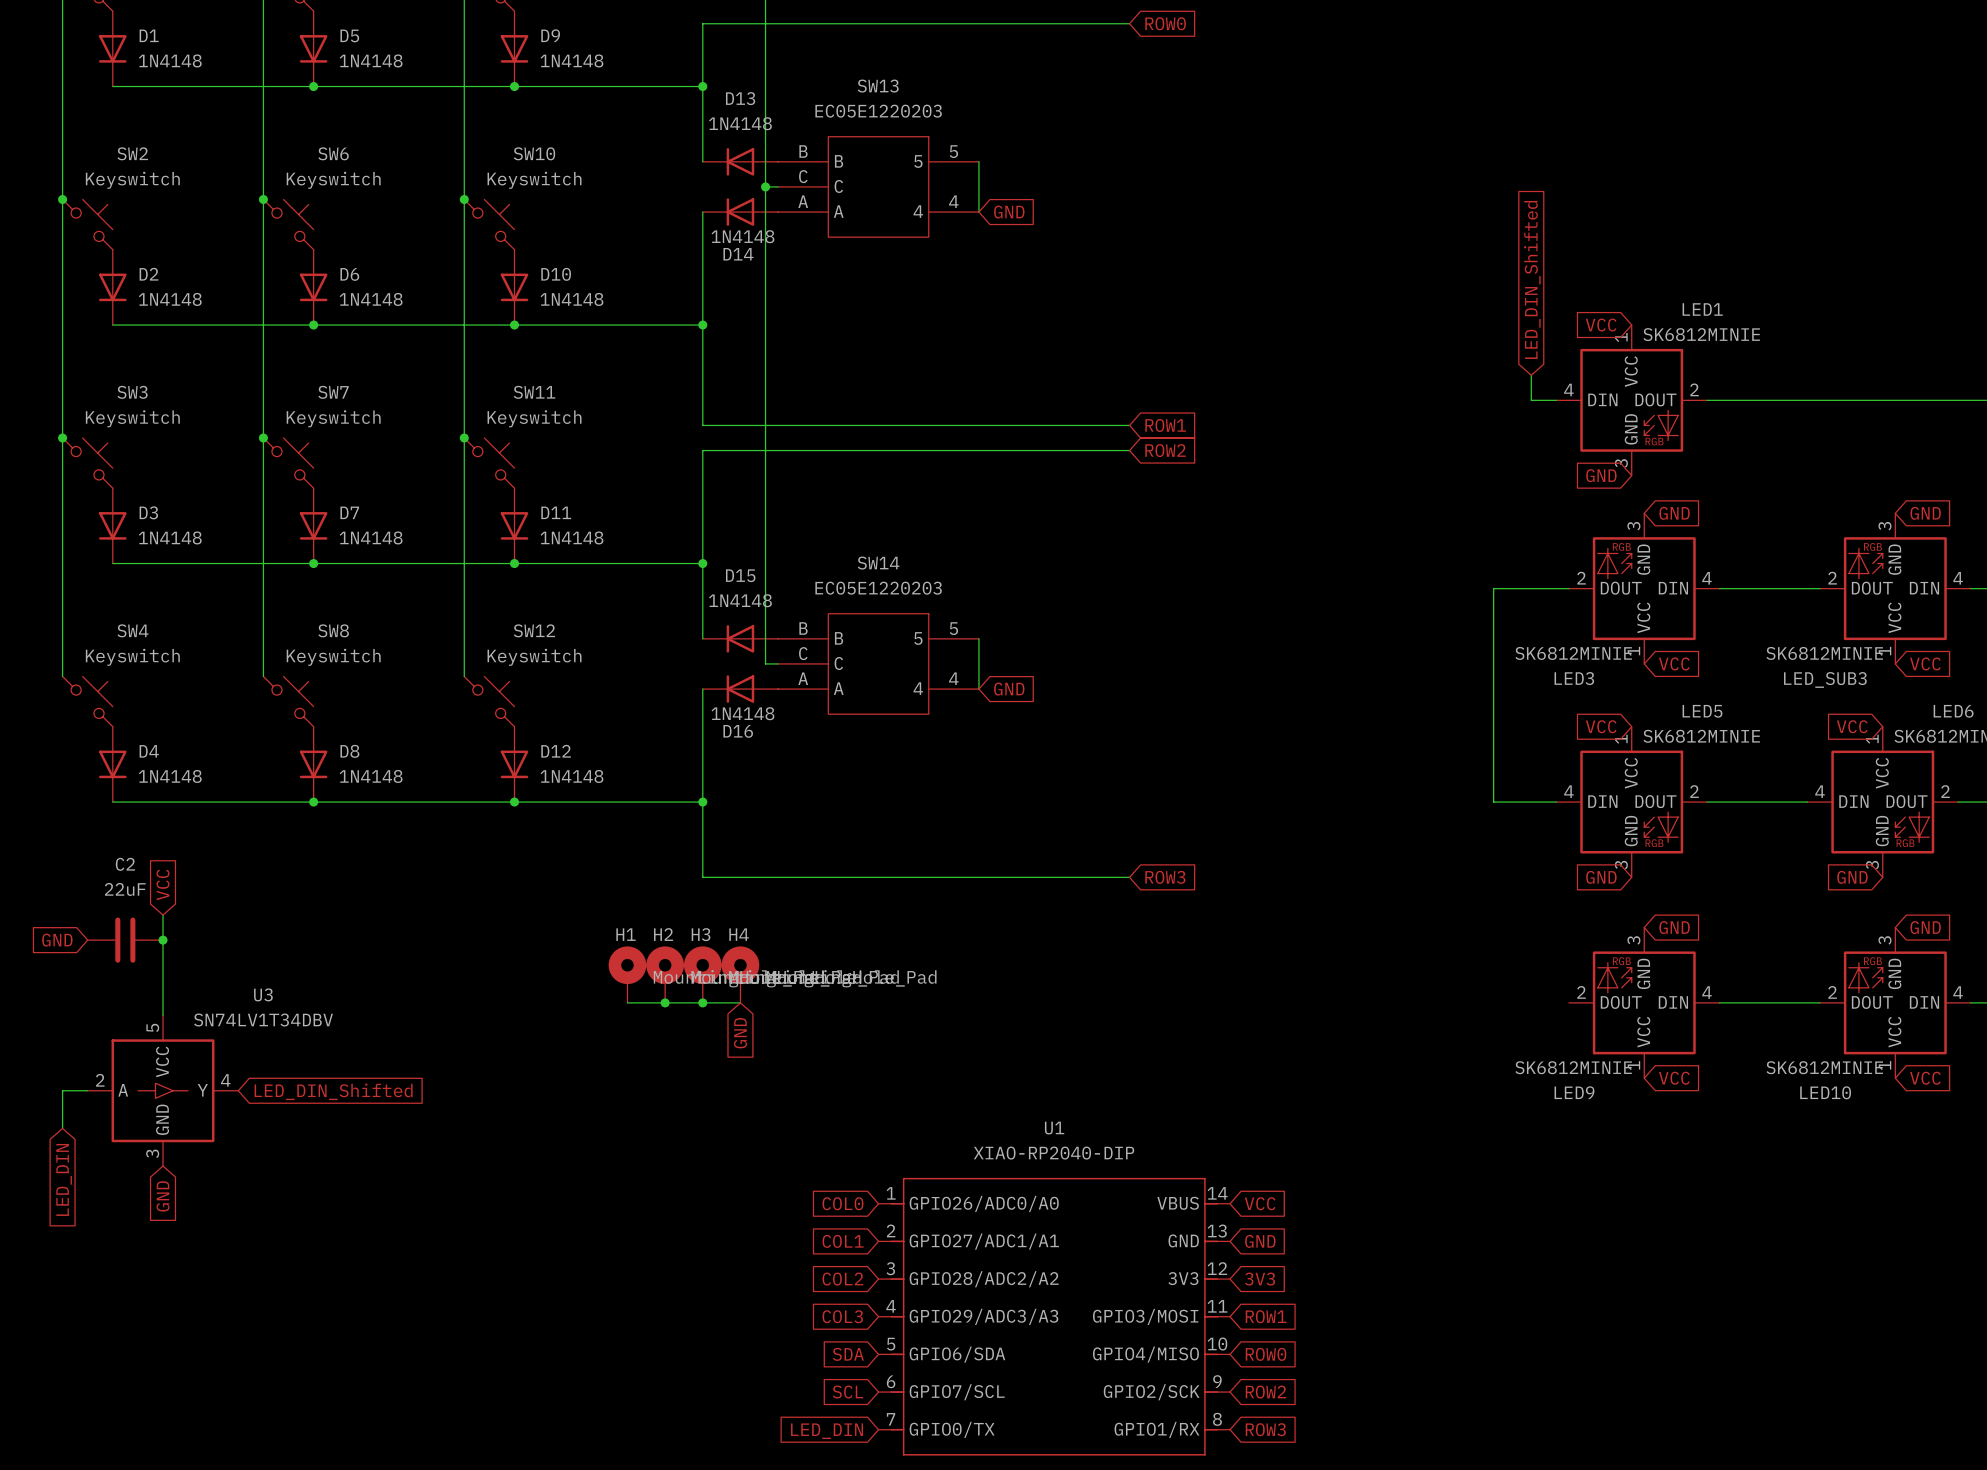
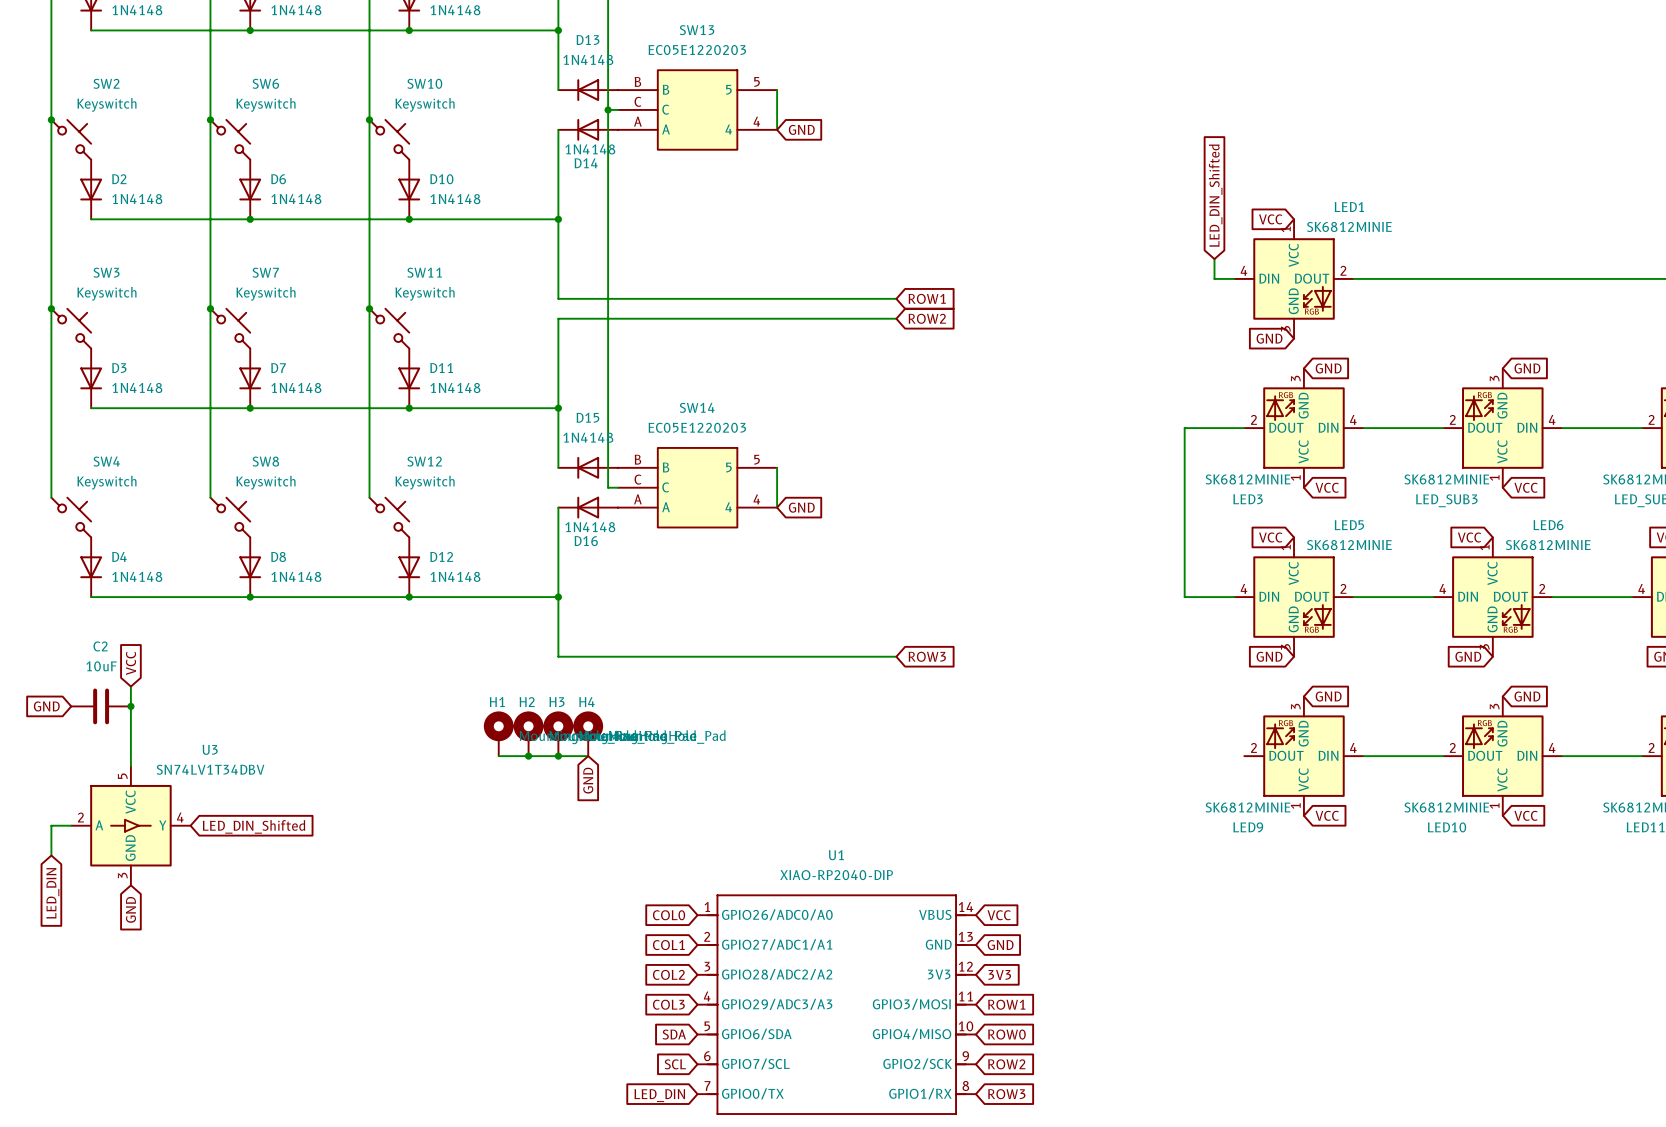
C2 value: 22uF (125, 889) -> 10uF (101, 666)

